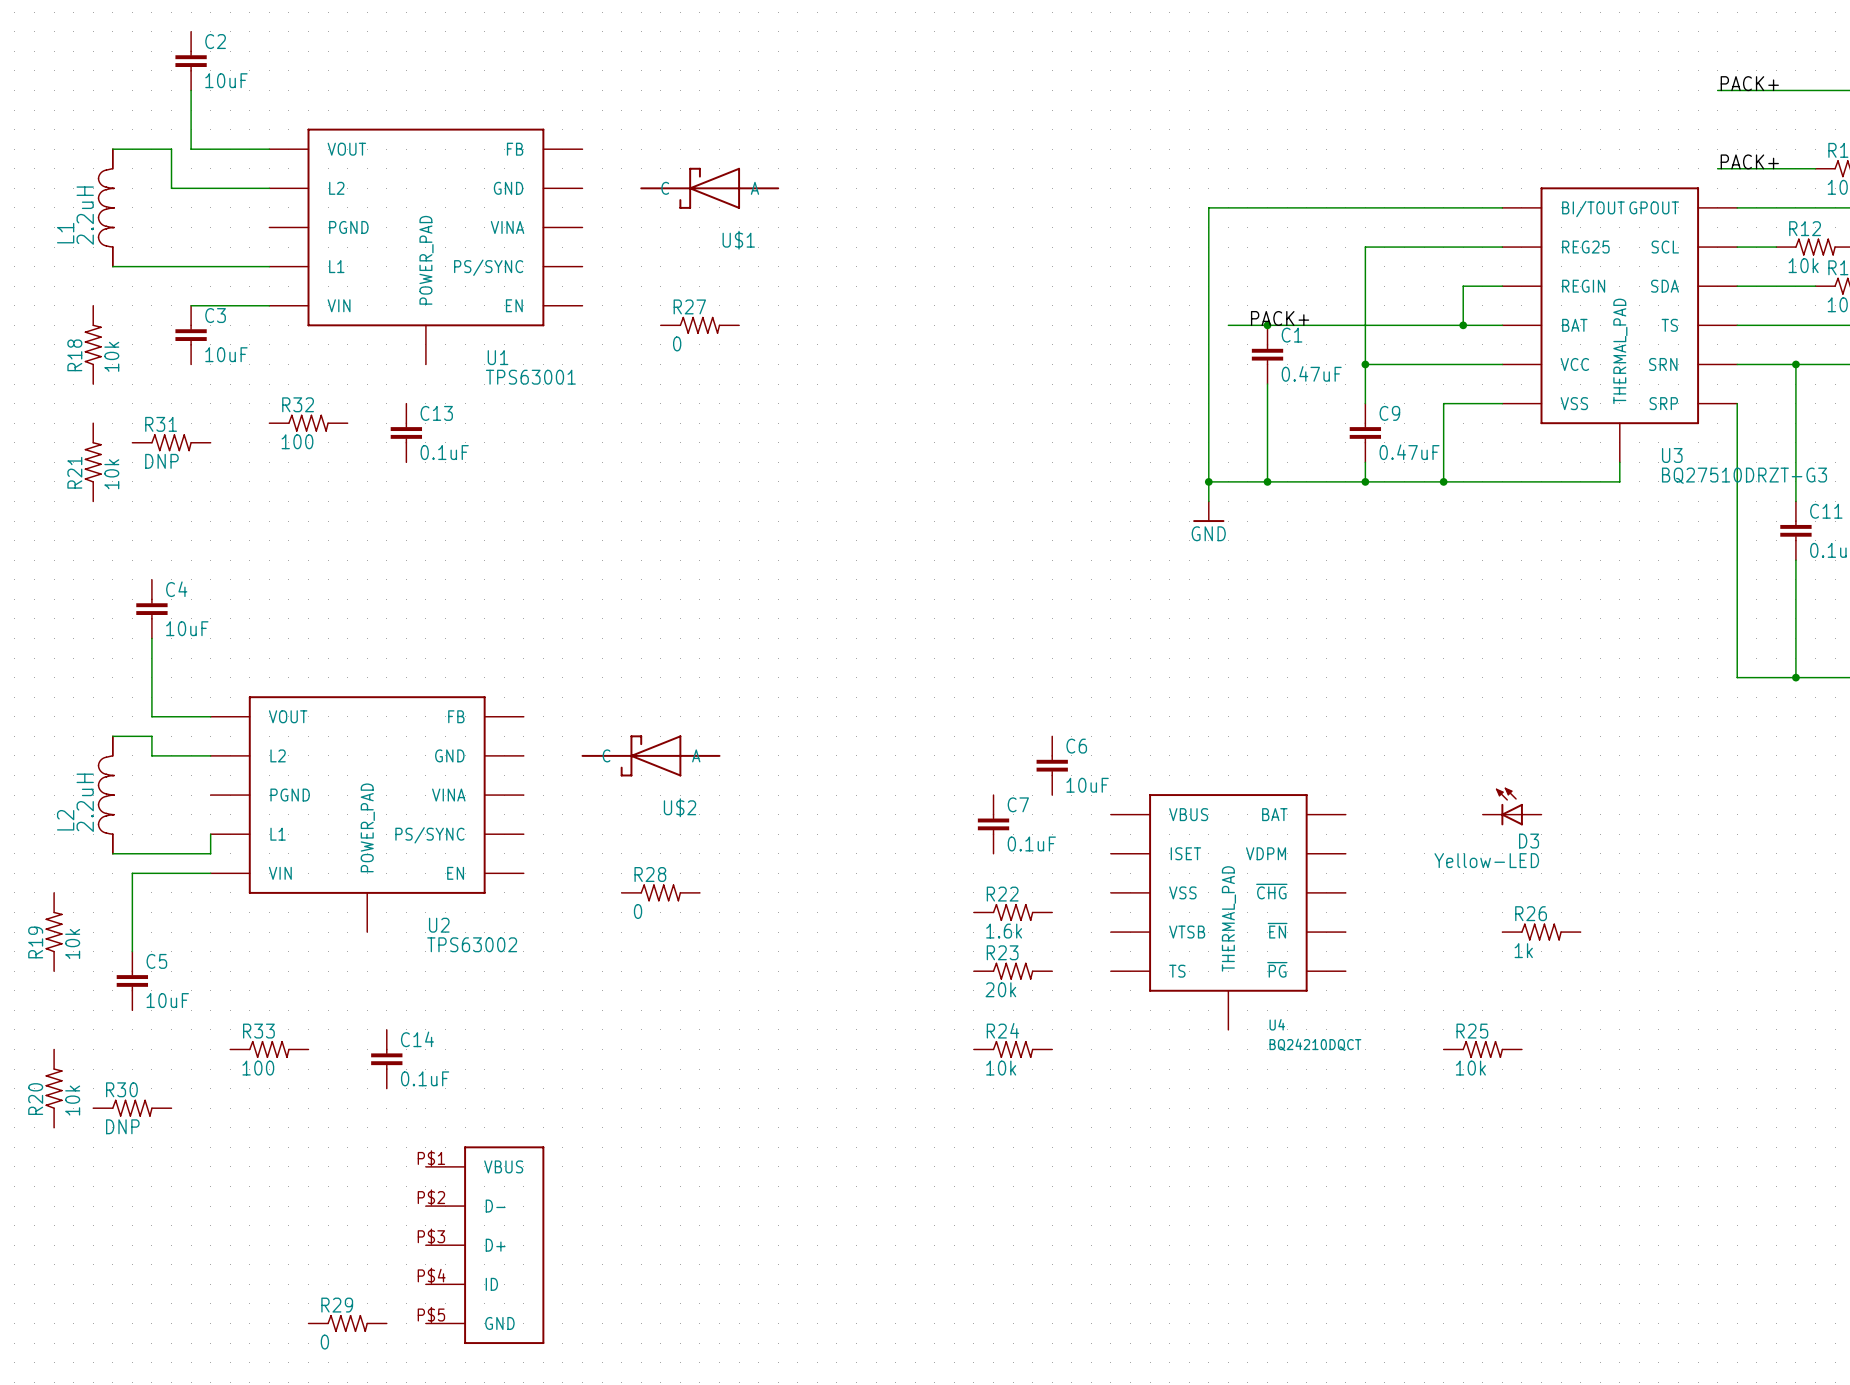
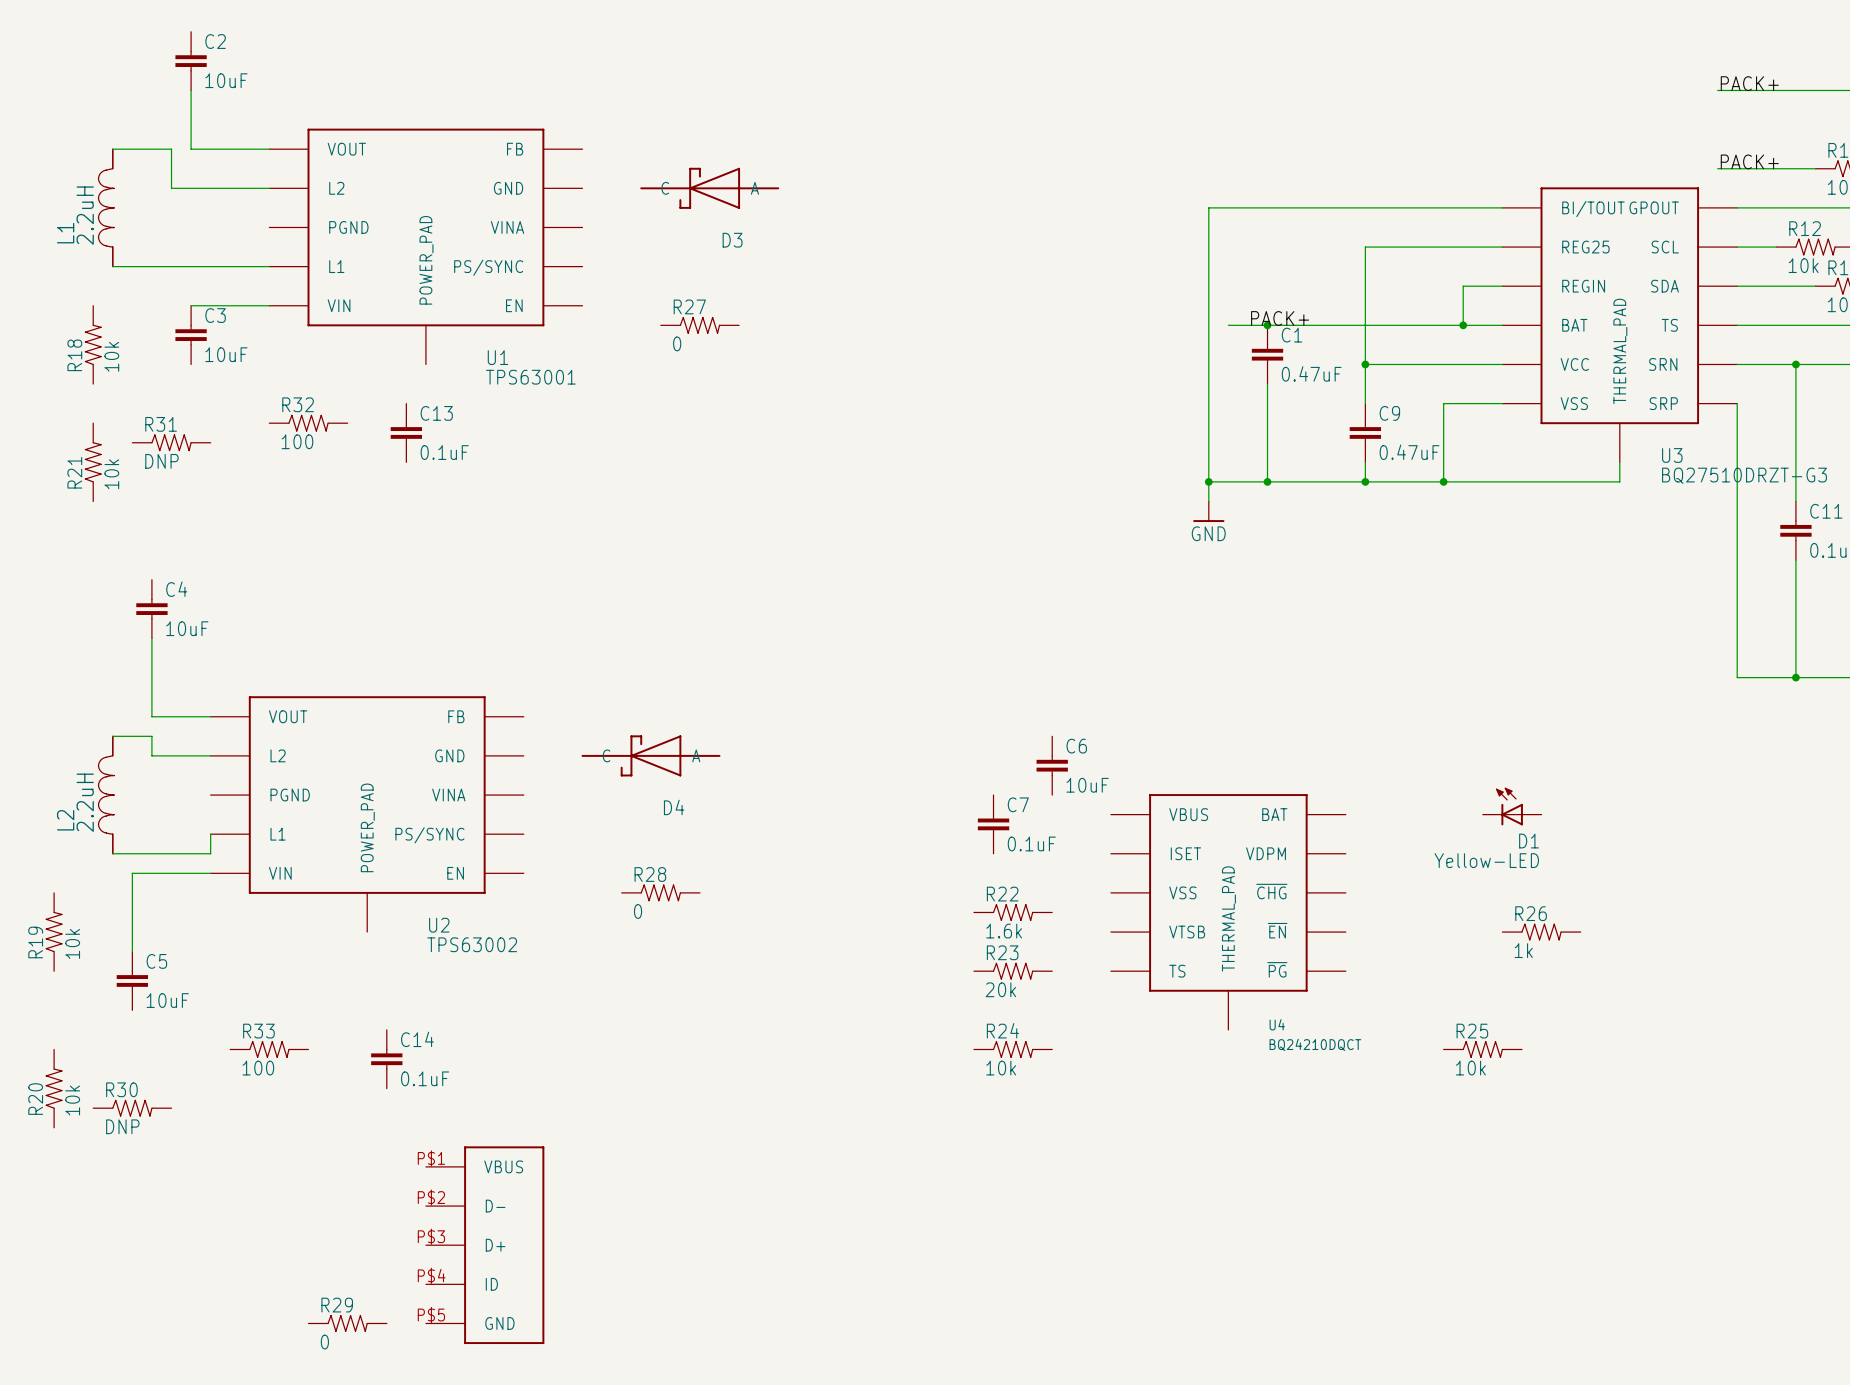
U$1 name: U$1 (738, 240) -> D3 (732, 240)
U$2 name: U$2 (680, 807) -> D4 (674, 807)
D3 name: D3 (1529, 841) -> D1 (1529, 841)

